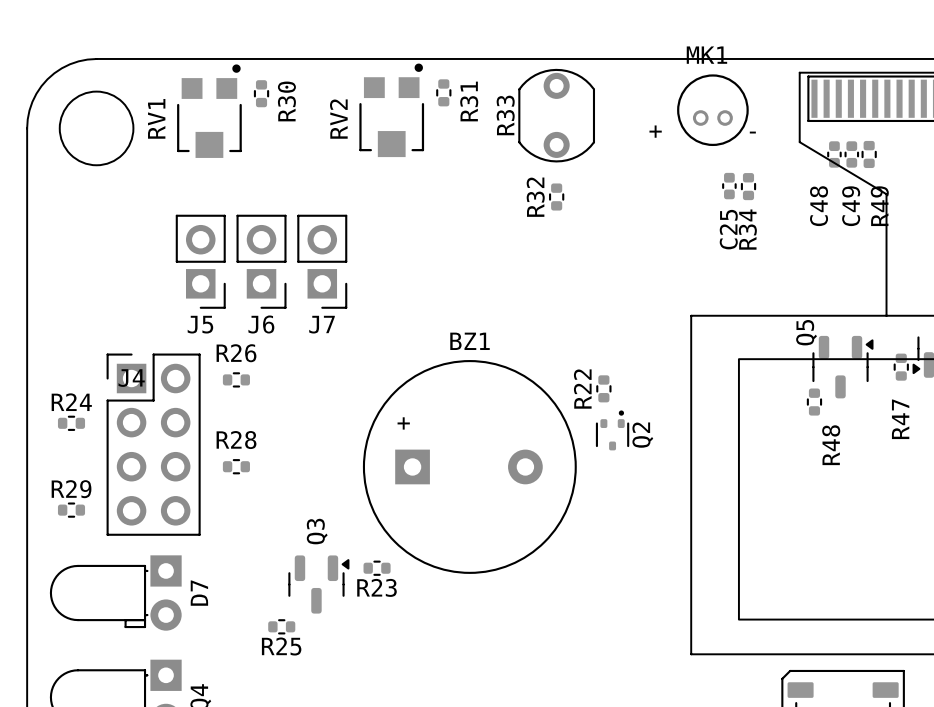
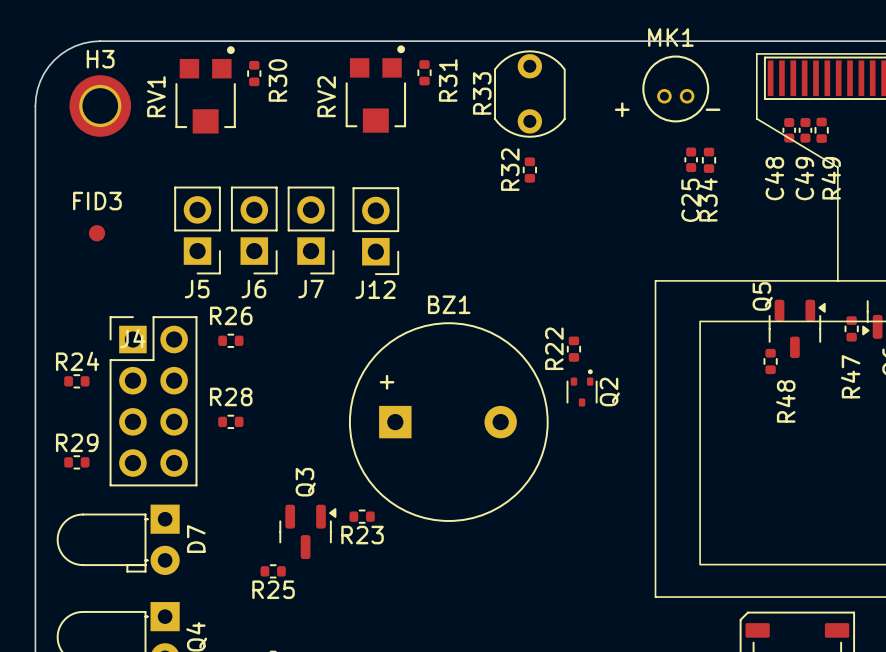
round board edge: [59, 91, 134, 166] -> none
H3: none -> (100, 105)
J12: none -> (375, 231)
FID3: none -> (97, 233)

